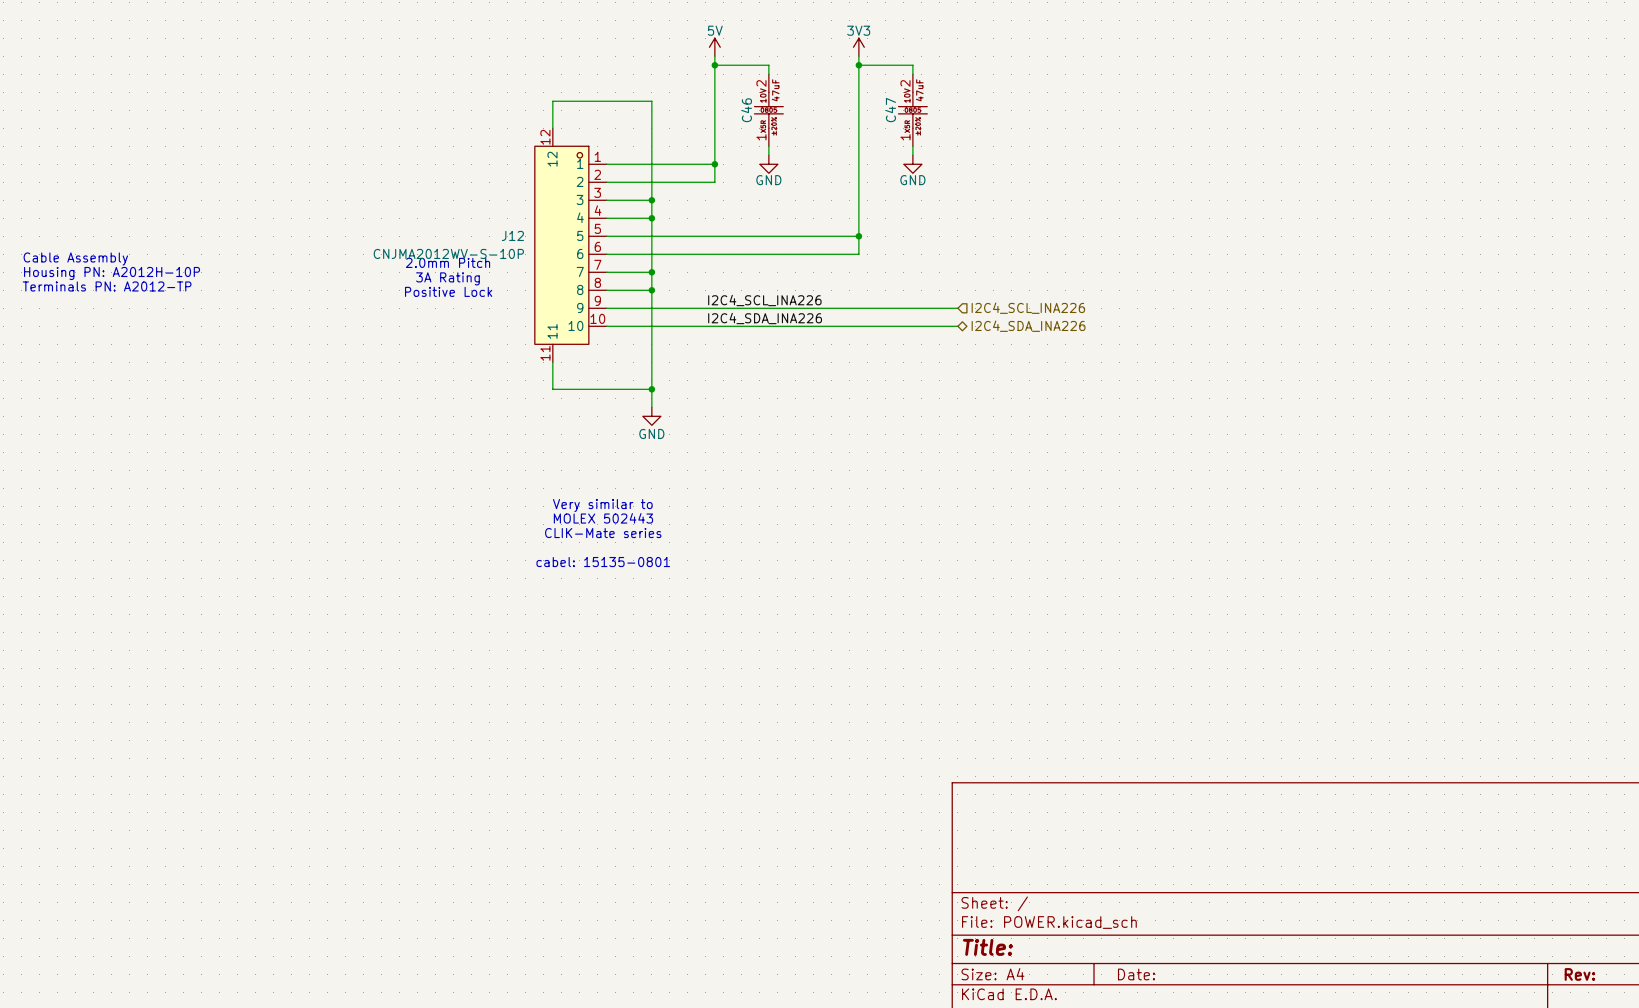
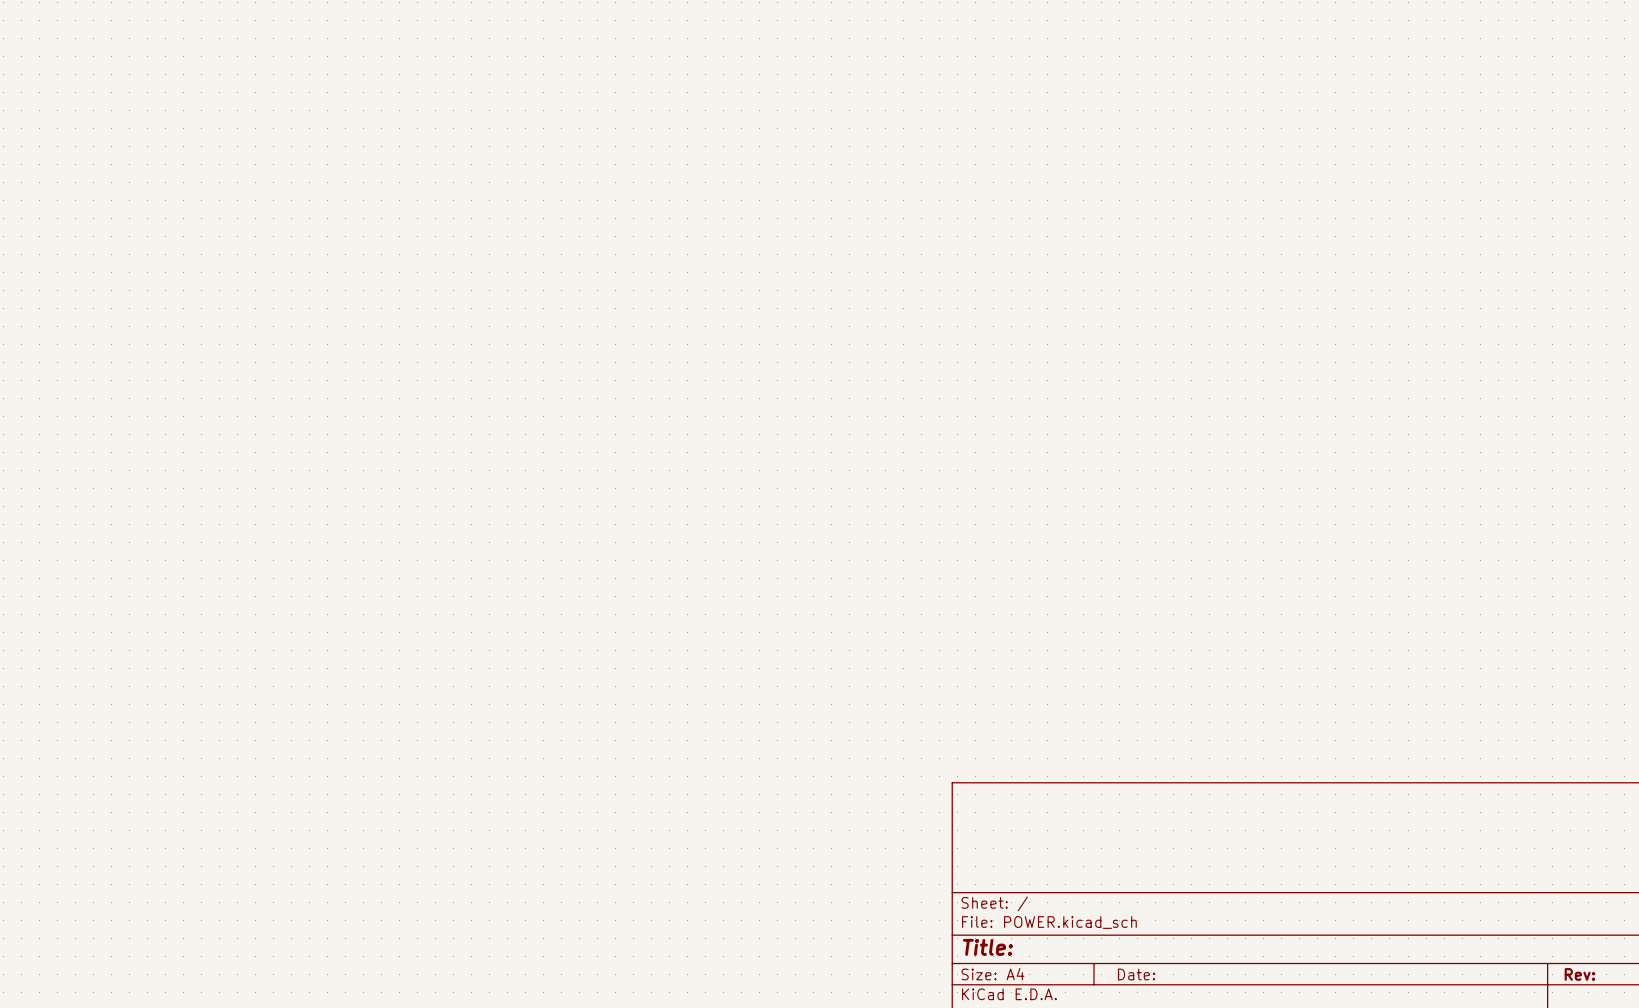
power symbol: 5V (714, 47) -> none
power symbol: 3V3 (858, 47) -> none
wire: (714, 56) (714, 182) (606, 182) -> none
wire: (858, 56) (858, 254) (606, 254) -> none
wire: (714, 65) (768, 65) (768, 74) -> none
junction: (714, 65) -> none
wire: (858, 65) (912, 65) (912, 74) -> none
junction: (858, 65) -> none
C46: (768, 110) -> none
C47: (912, 110) -> none
wire: (552, 128) (552, 101) (651, 101) (651, 407) -> none
wire: (768, 146) (768, 155) -> none
wire: (912, 146) (912, 155) -> none
wire: (606, 164) (714, 164) -> none
junction: (714, 164) -> none
power symbol: GND (768, 164) -> none
power symbol: GND (912, 164) -> none
wire: (606, 200) (651, 200) -> none
junction: (651, 200) -> none
wire: (606, 218) (651, 218) -> none
junction: (651, 218) -> none
wire: (606, 236) (858, 236) -> none
junction: (858, 236) -> none
J12: CNJMA2012WV-S-10P (570, 245) -> none
text: Cable Assembly (75, 258) -> none
text: 2.0mm Pitch (447, 262) -> none
wire: (606, 272) (651, 272) -> none
junction: (651, 272) -> none
text: Housing PN: A2012H-10P (112, 273) -> none
text: 3A Rating (447, 278) -> none
text: Terminals PN: A2012-TP (107, 286) -> none
wire: (606, 290) (651, 290) -> none
junction: (651, 290) -> none
text: Positive Lock (448, 291) -> none
label: I2C4_SCL_INA226 (764, 300) -> none
wire: (606, 308) (957, 308) -> none
hierarchical label: I2C4_SCL_INA226 (1028, 308) -> none
label: I2C4_SDA_INA226 (765, 318) -> none
wire: (606, 326) (957, 326) -> none
hierarchical label: I2C4_SDA_INA226 (1028, 326) -> none
wire: (552, 362) (552, 389) (651, 389) -> none
junction: (651, 389) -> none
power symbol: GND (651, 416) -> none
text: Very similar to (602, 505) -> none
text: MOLEX 502443 (603, 518) -> none
text: CLIK-Mate series (603, 533) -> none
text: cabel: 15135-0801 (603, 562) -> none

